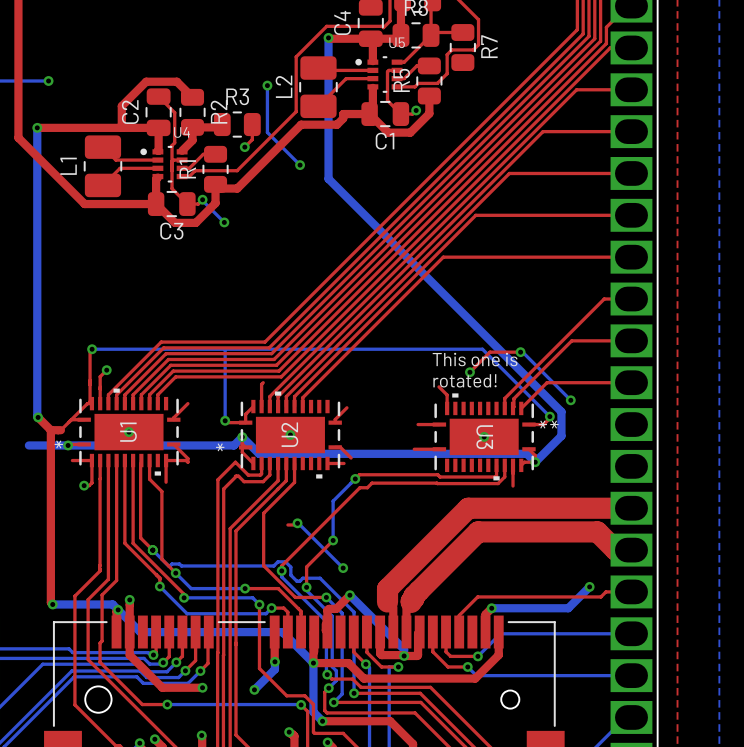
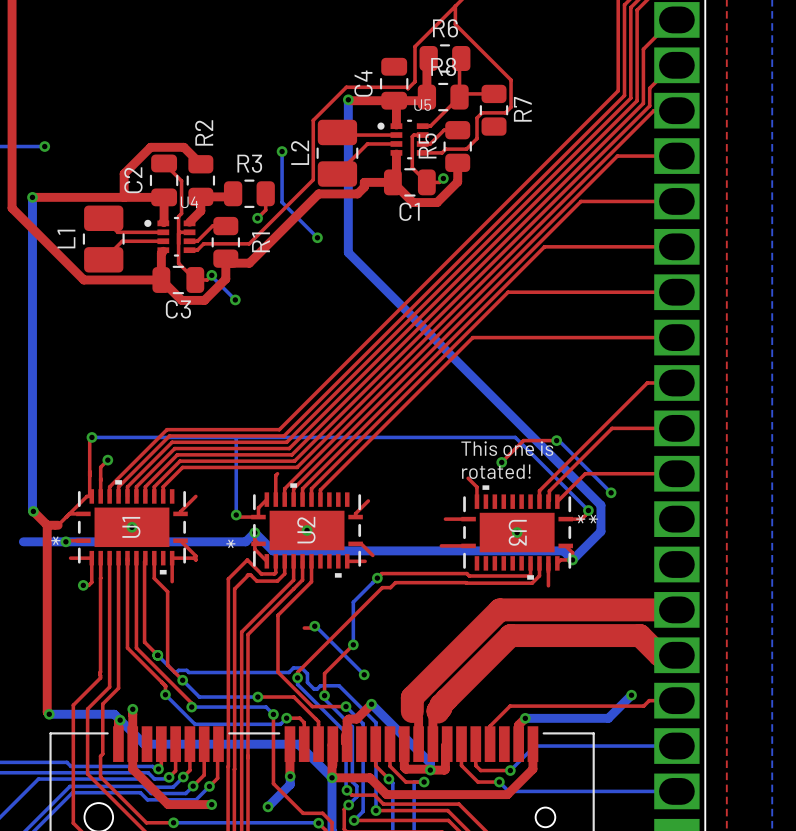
R2 name position: R2 (218, 111) -> R2 (204, 132)
R1 name position: R1 (187, 169) -> R1 (260, 242)

